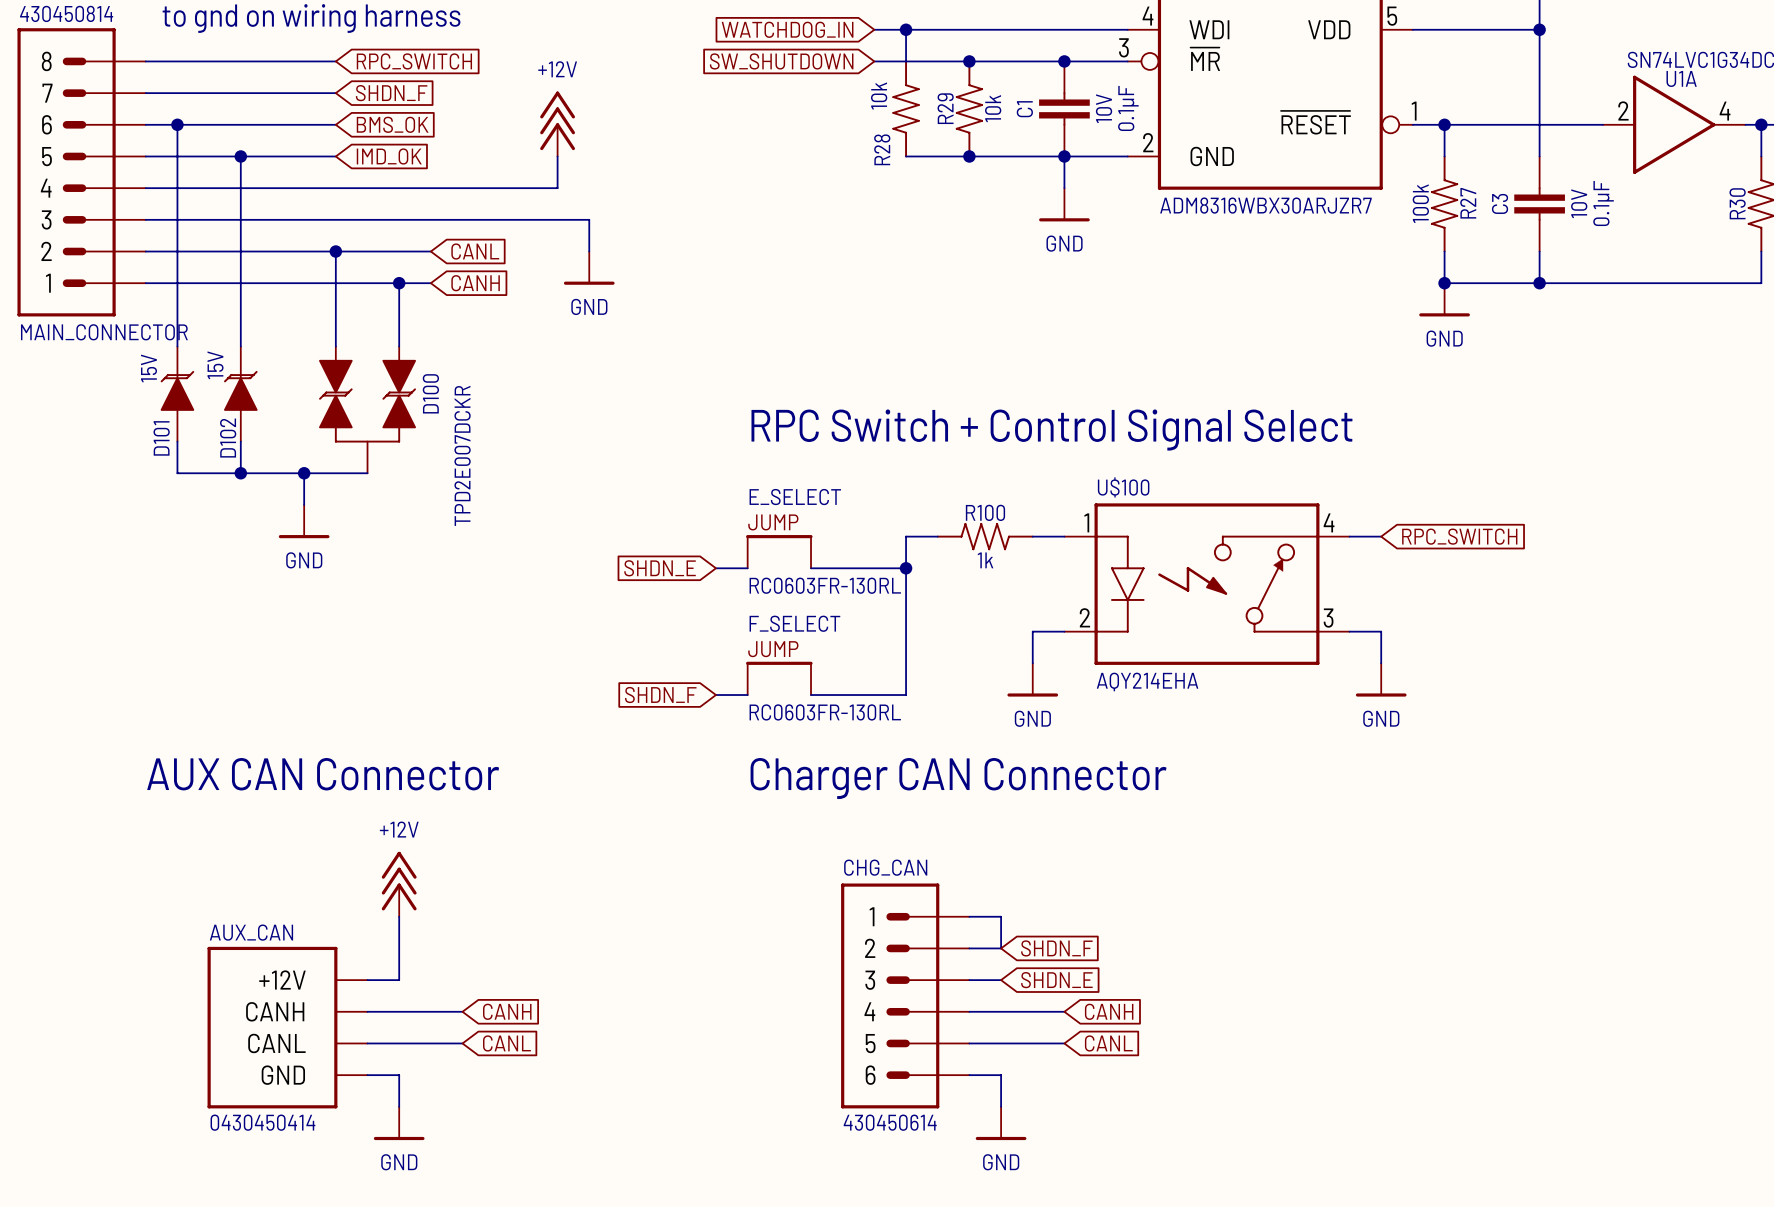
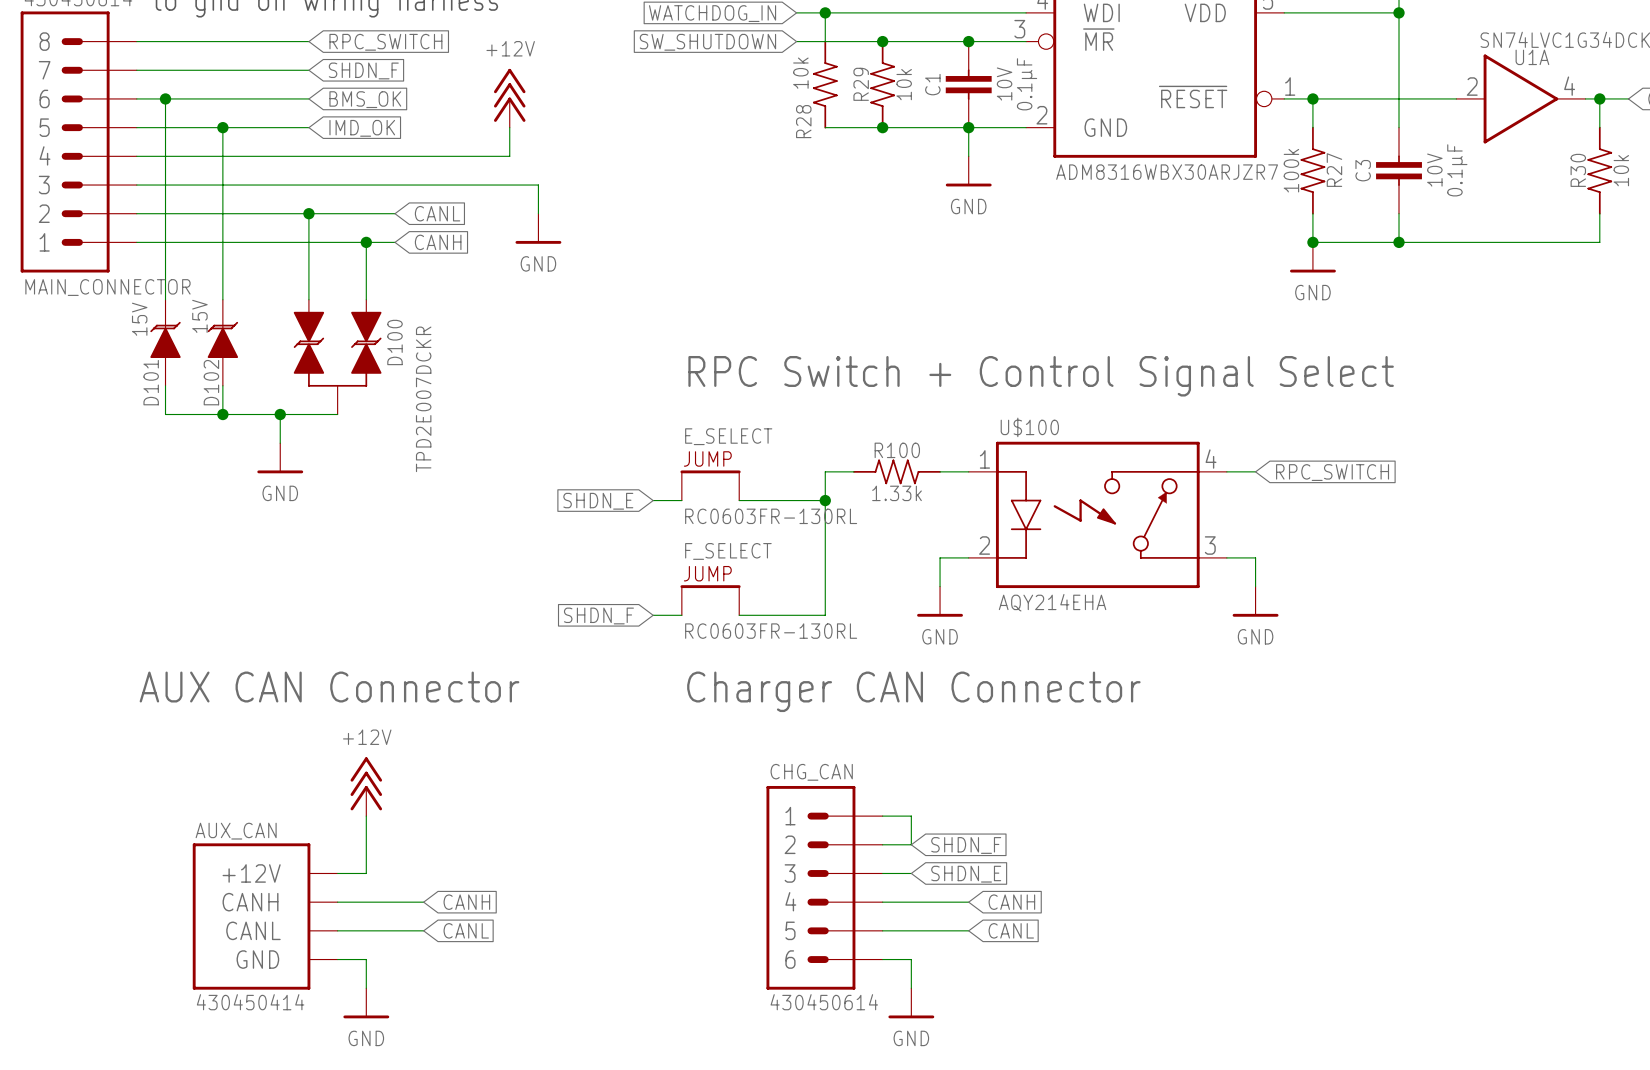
R100 text: 1k (985, 560) -> 1.33k (897, 493)
AUX_CAN text: 0430450414 (262, 1122) -> 430450414 (250, 1002)

